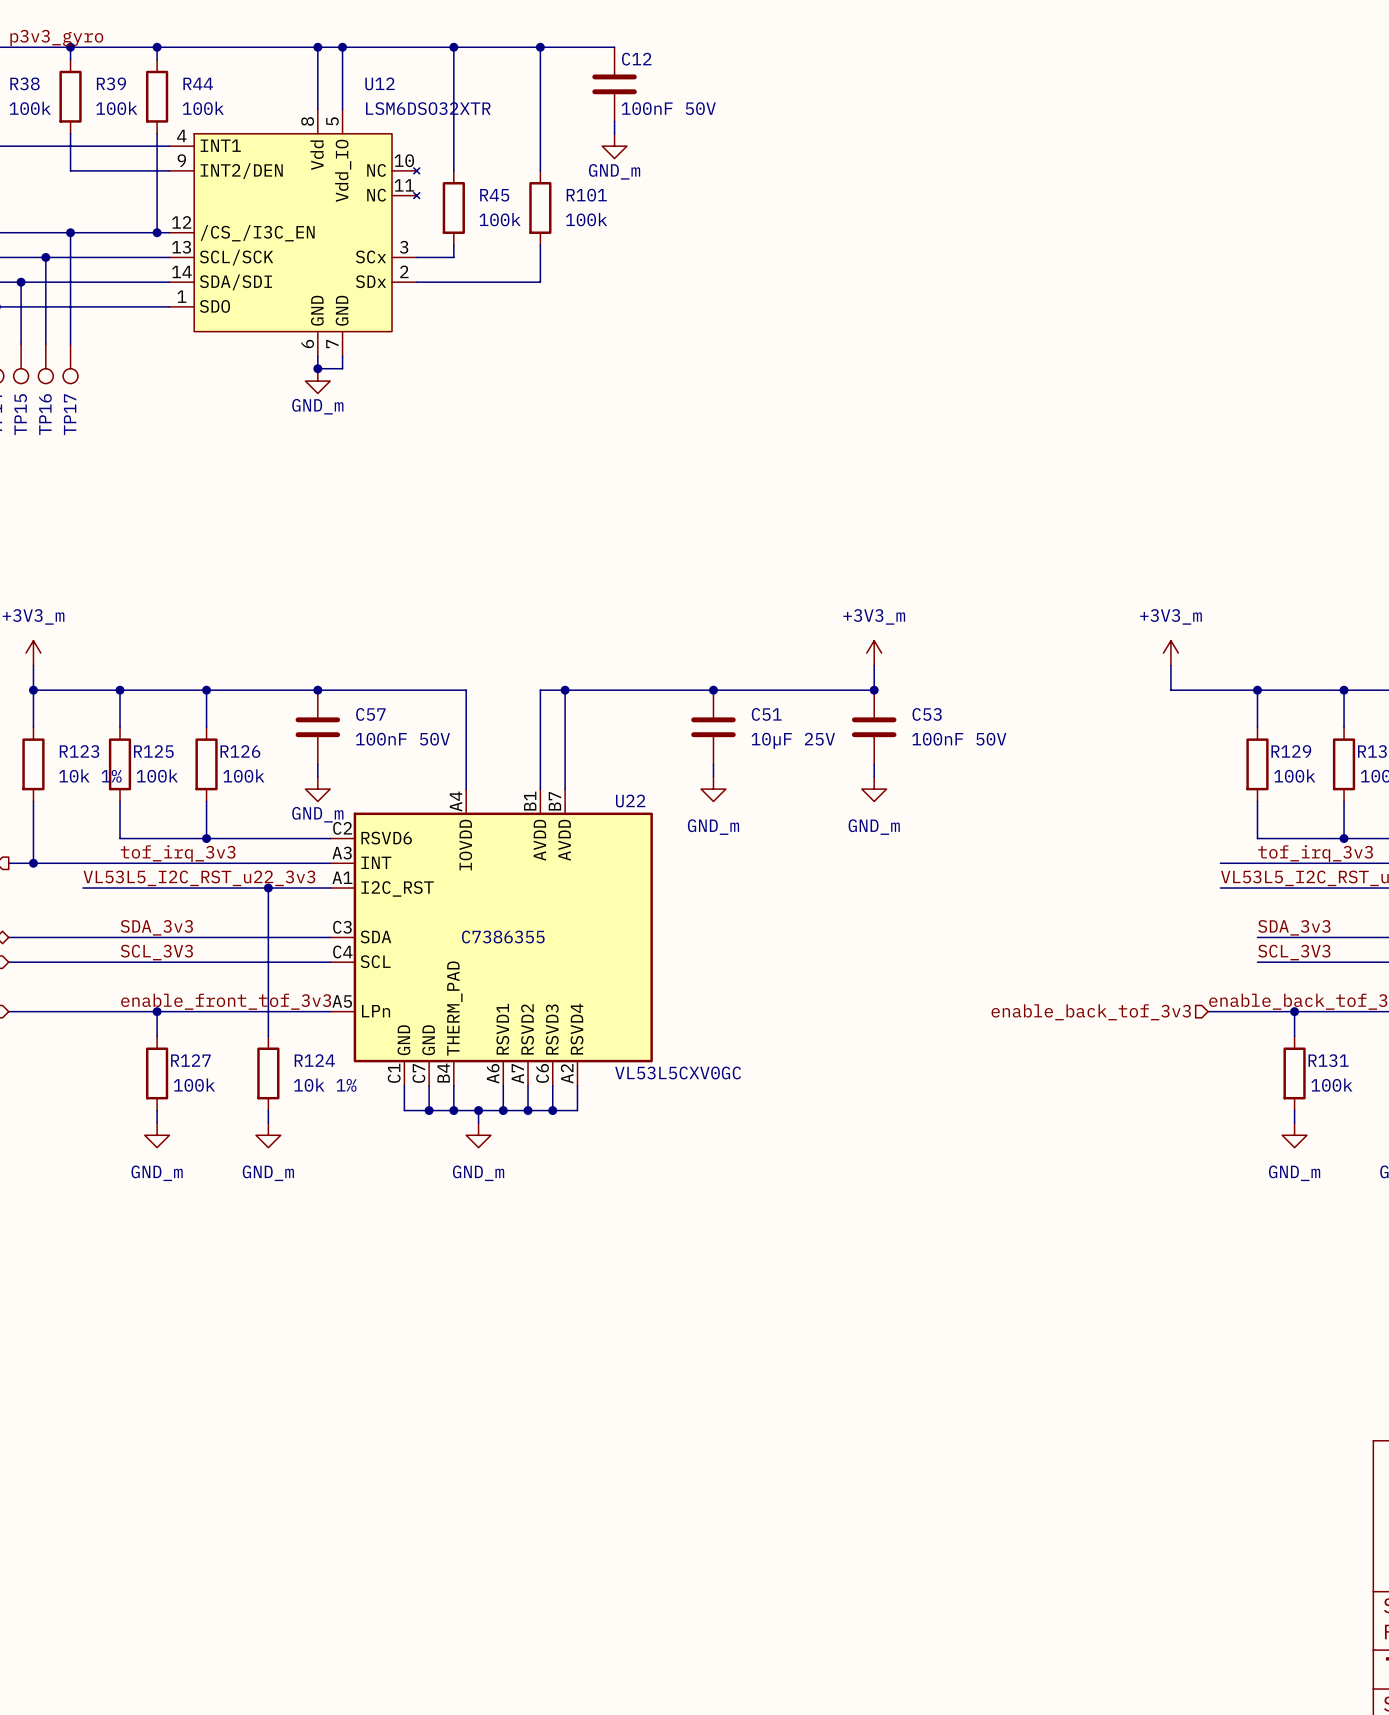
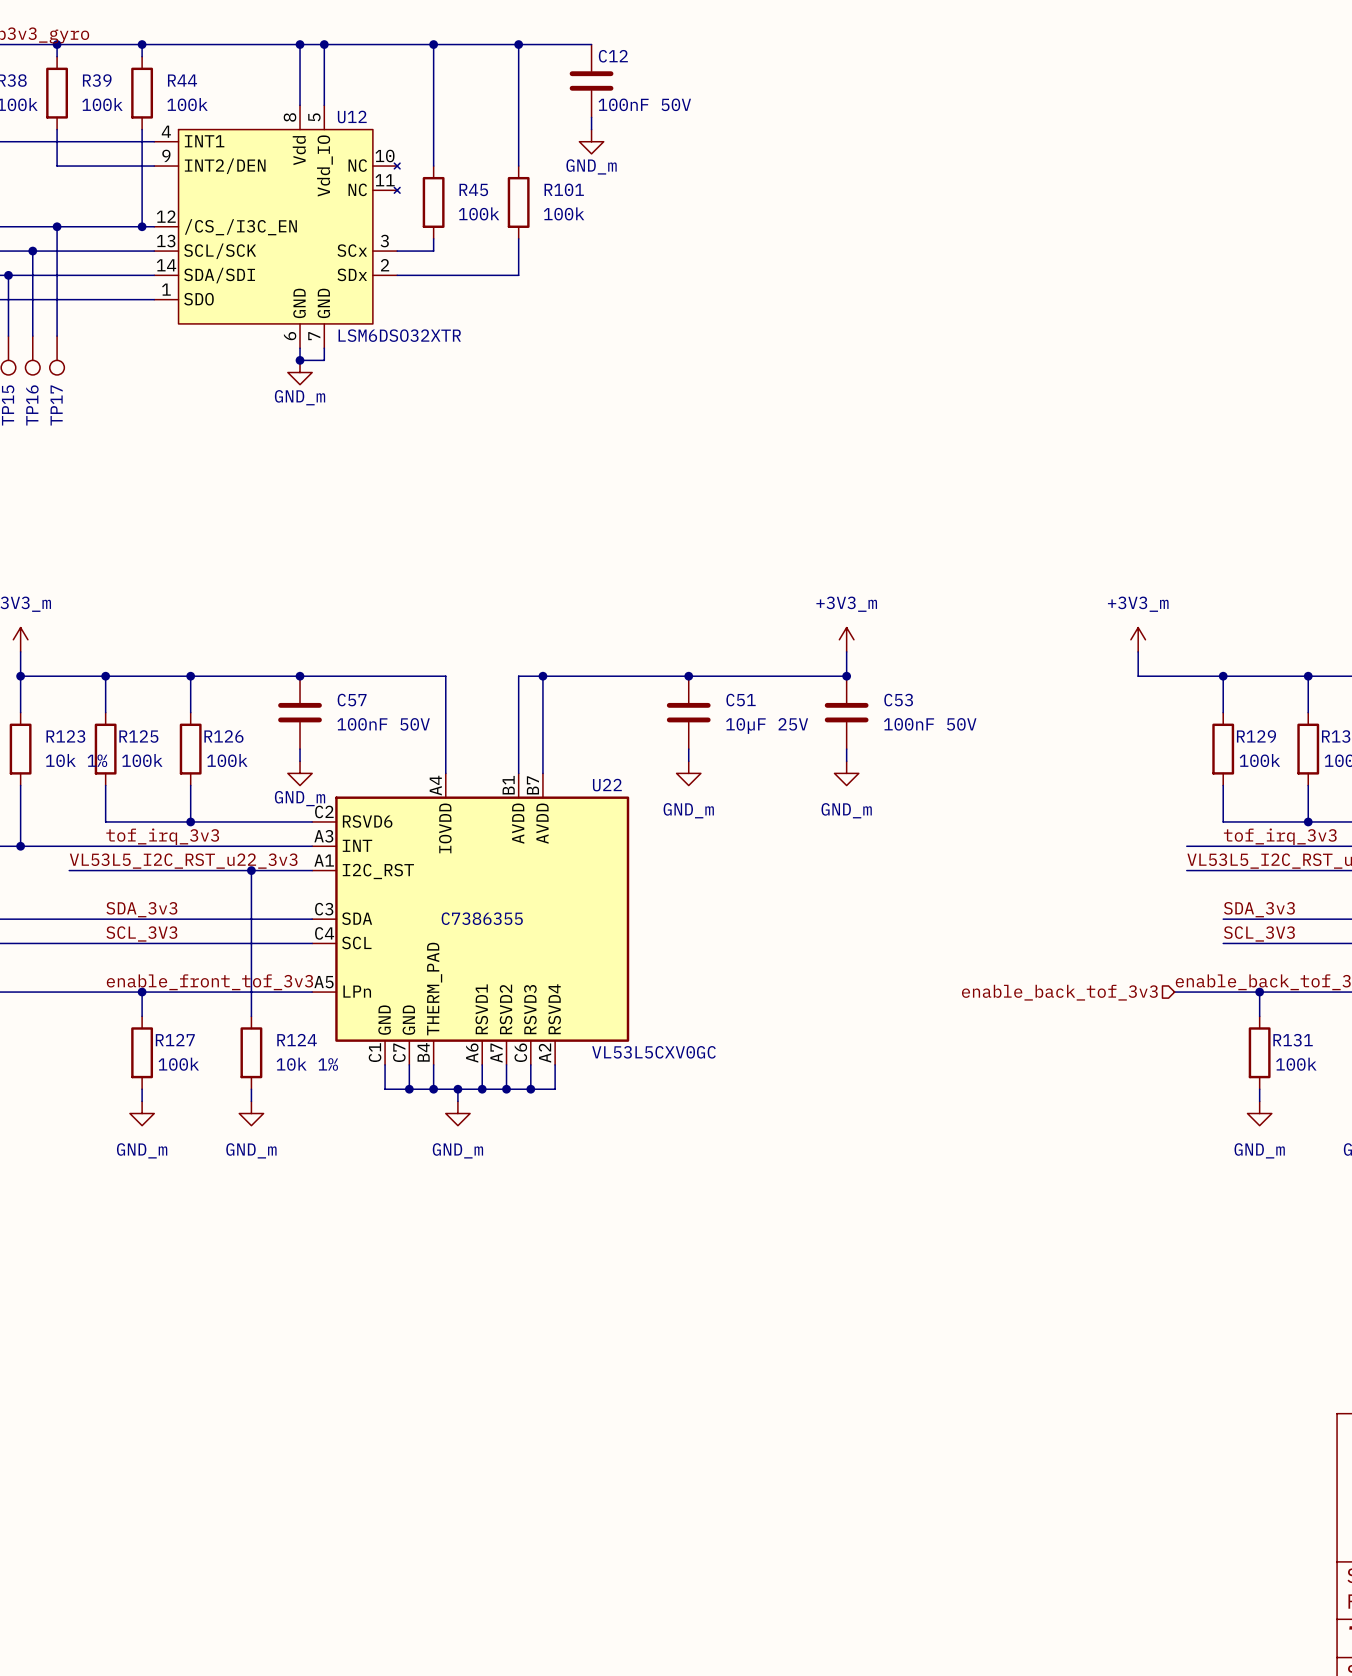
U12 name position: U12 (380, 83) -> U12 (352, 116)
U12 value position: LSM6DSO32XTR (428, 108) -> LSM6DSO32XTR (399, 335)

